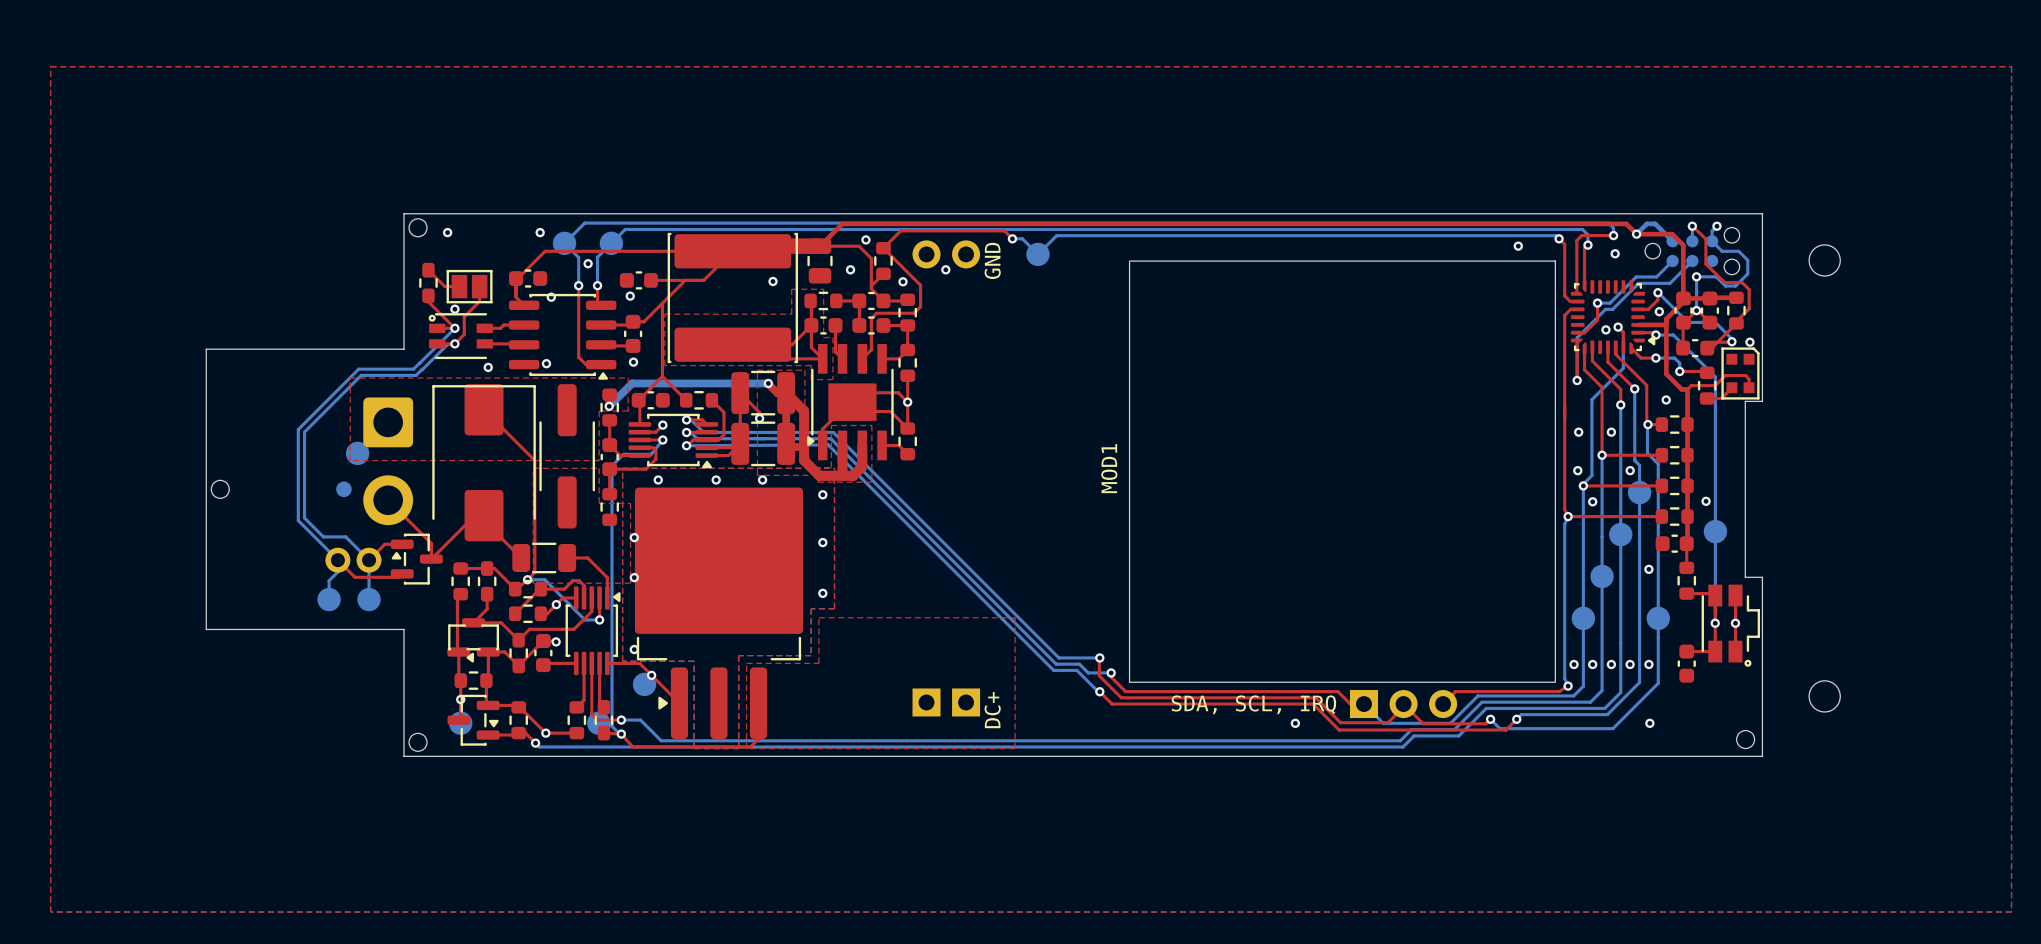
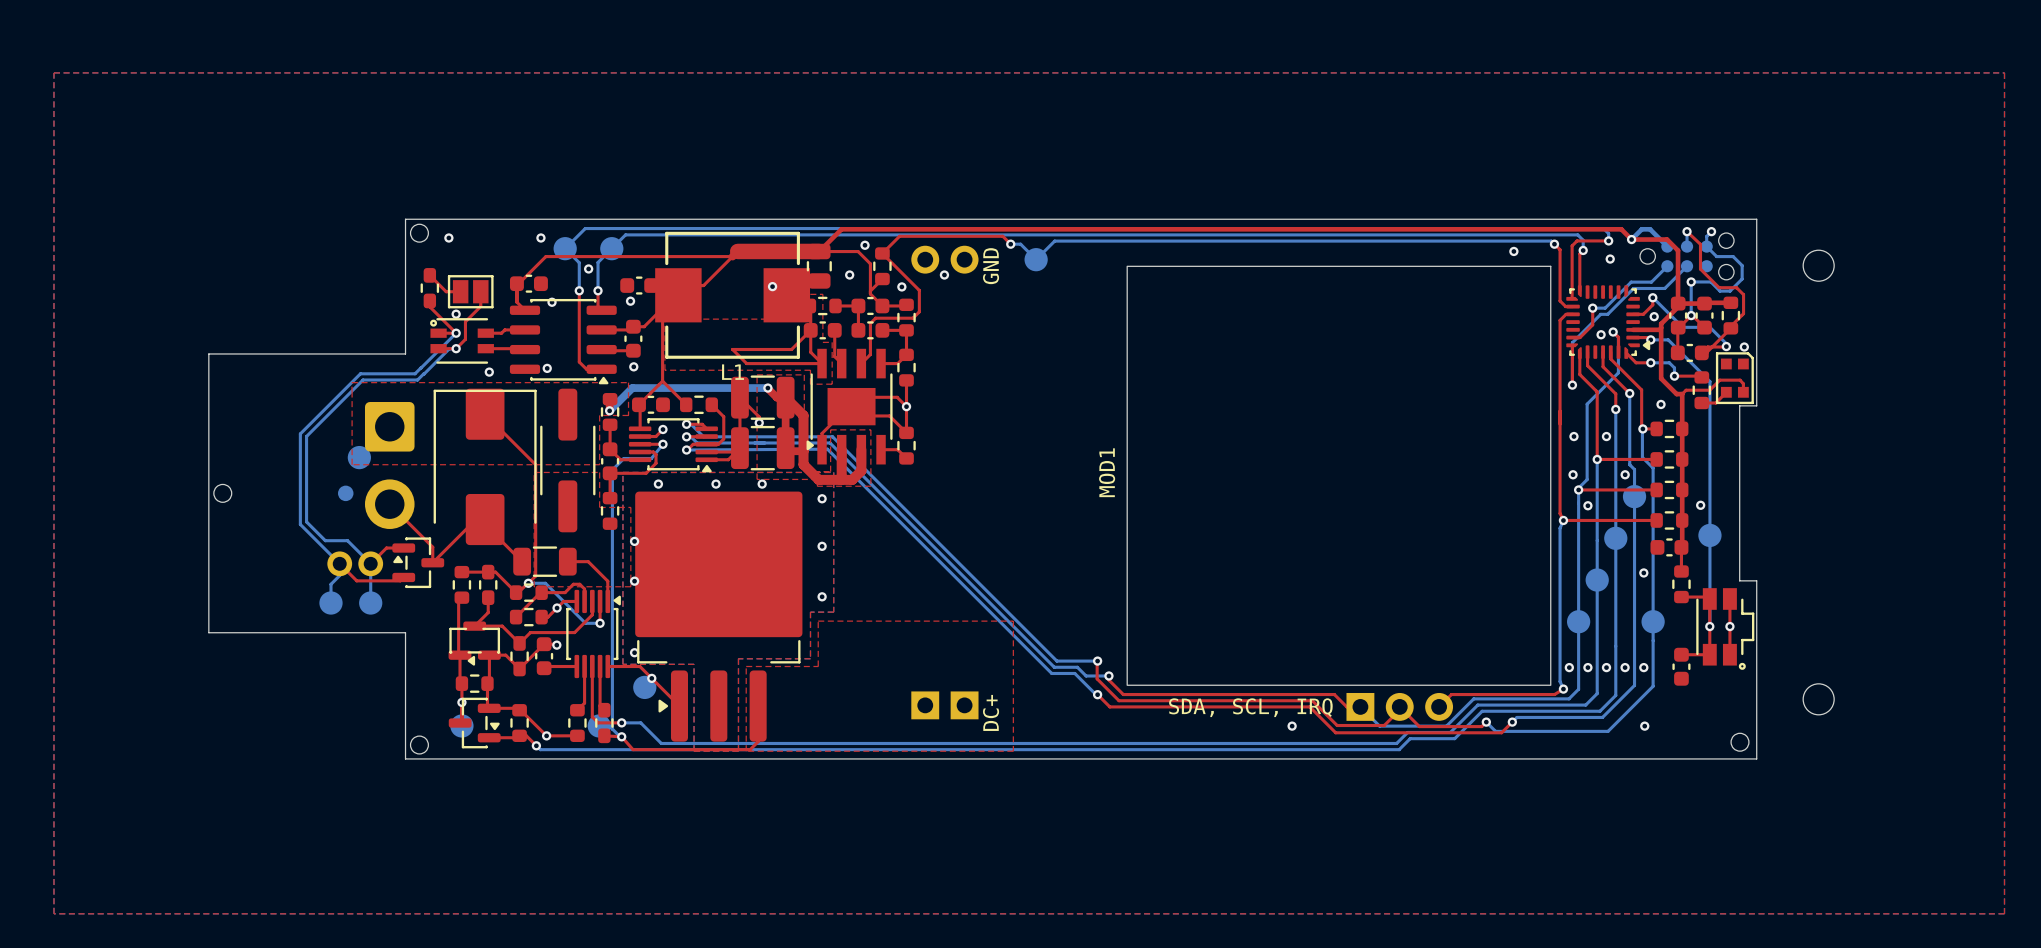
L1: none -> (732, 295)
part: (732, 297) -> none

